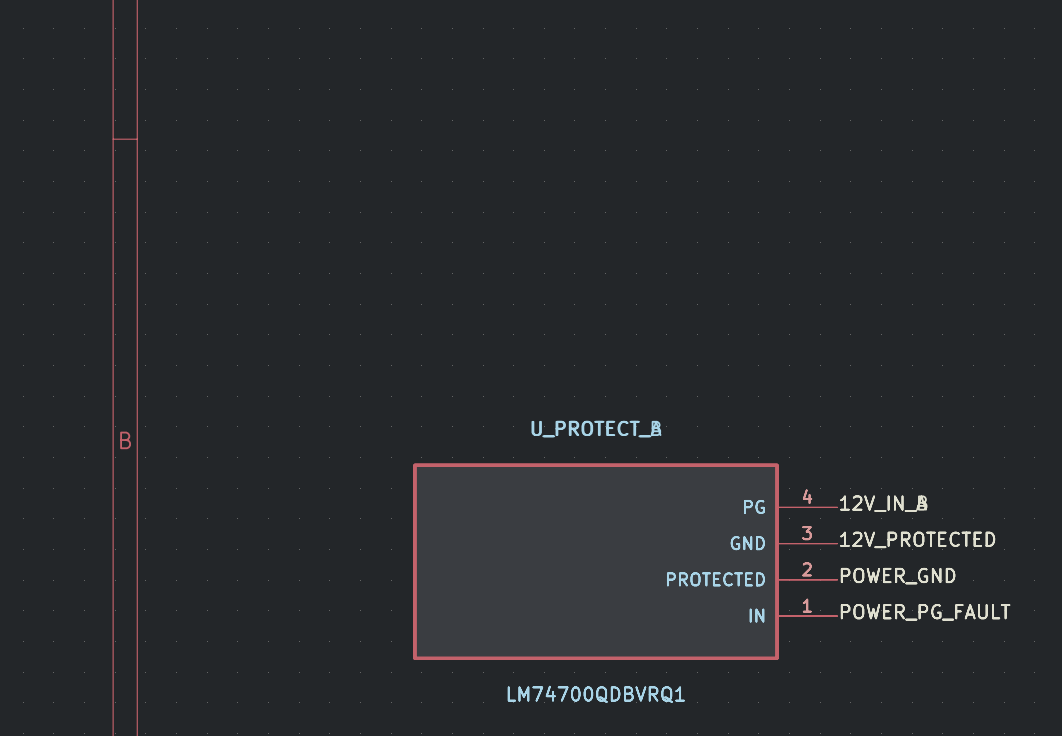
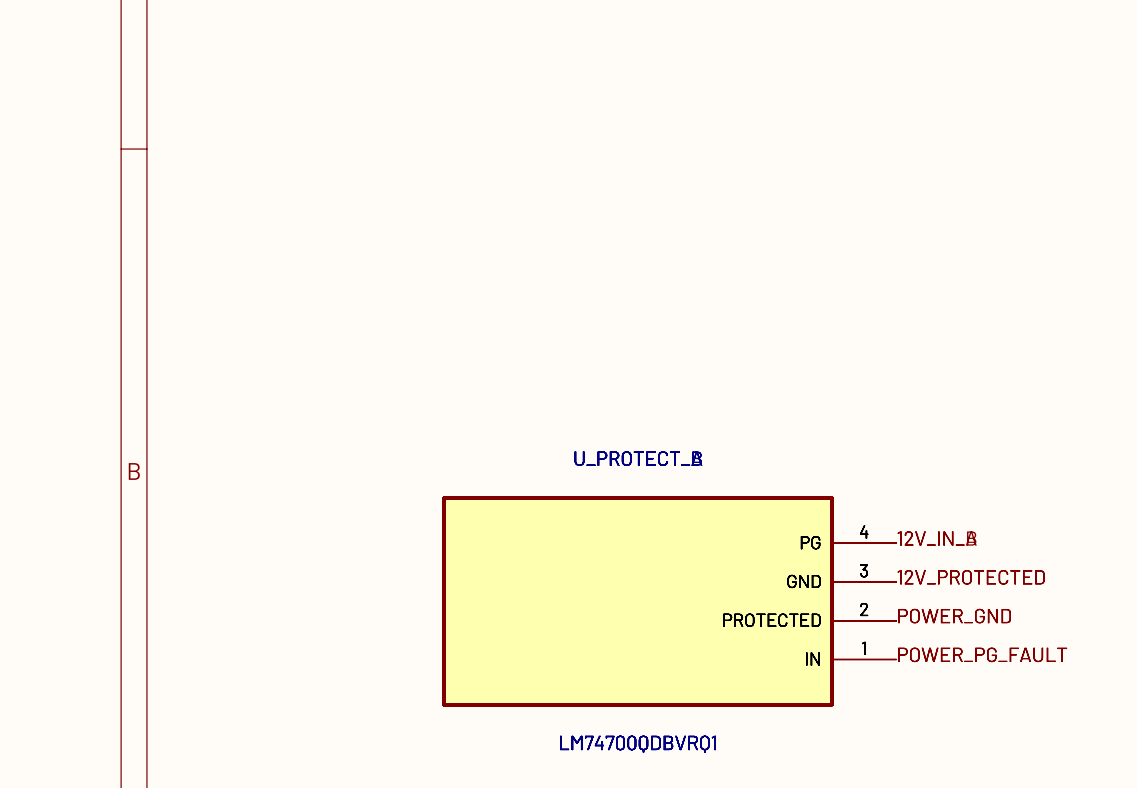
part: none -> LM74700QDBVRQ1 (669, 601)
part: none -> LM74700QDBVRQ1 (669, 601)

